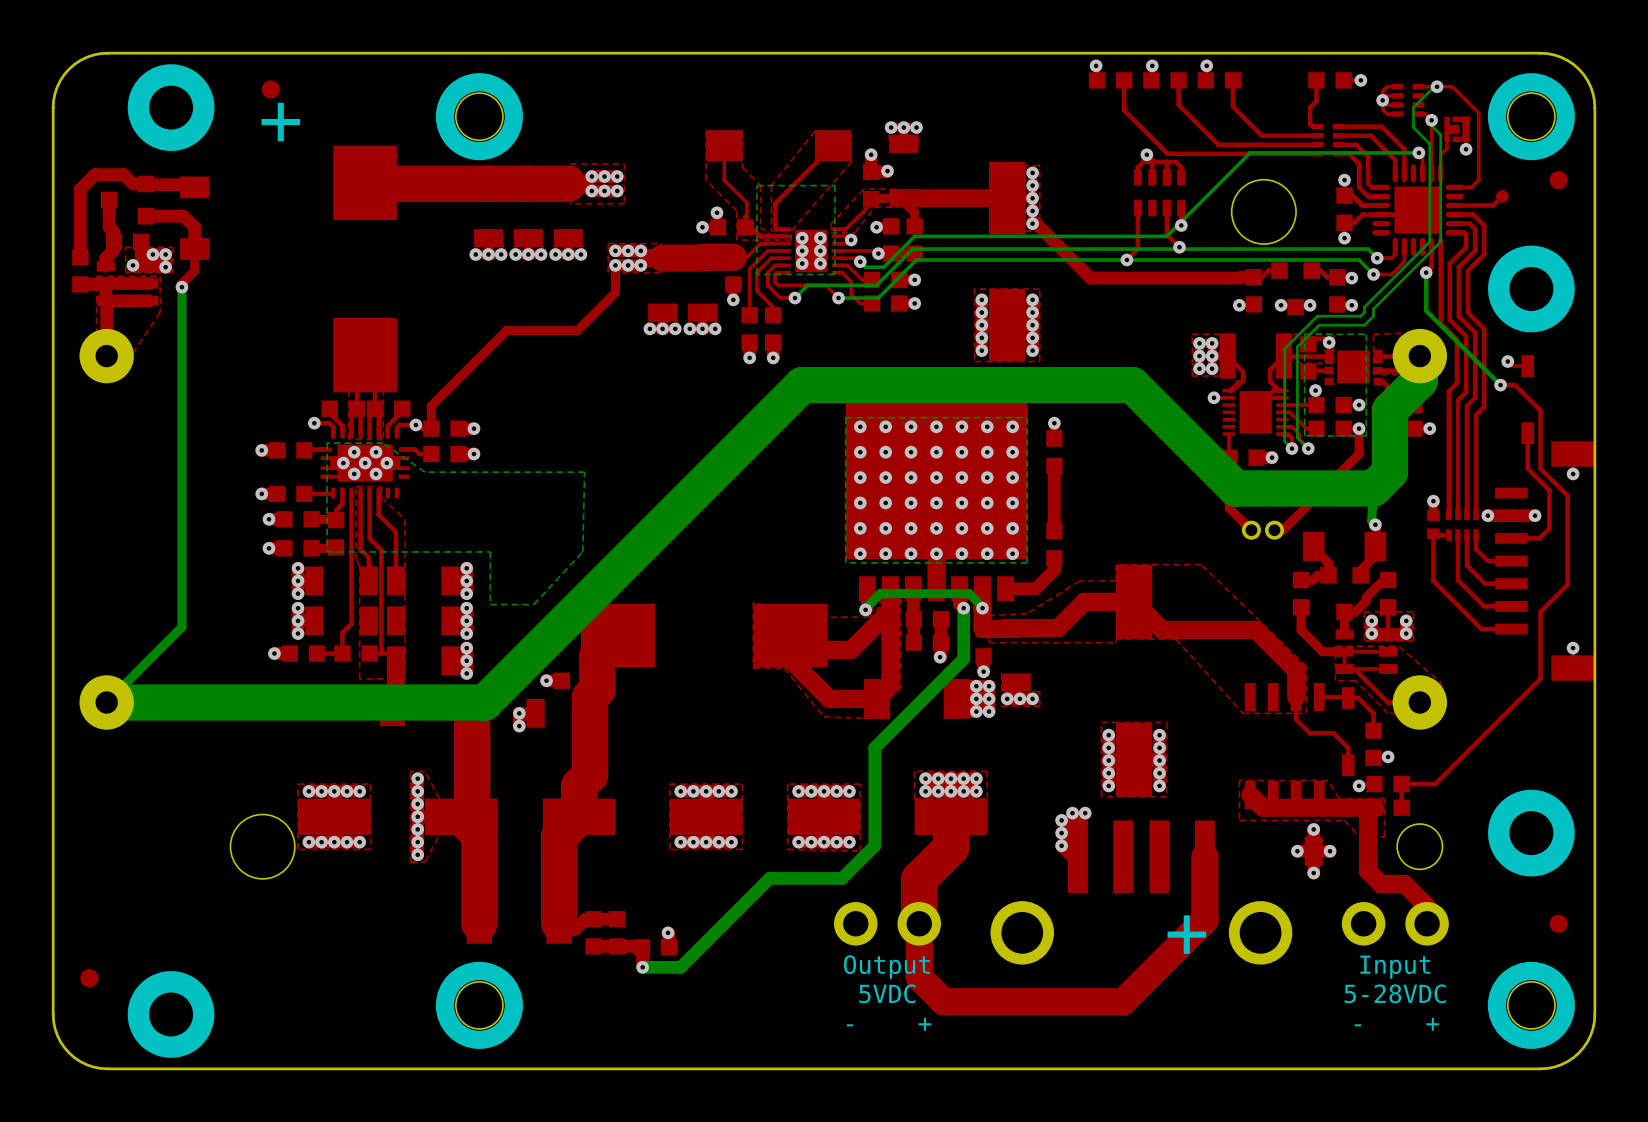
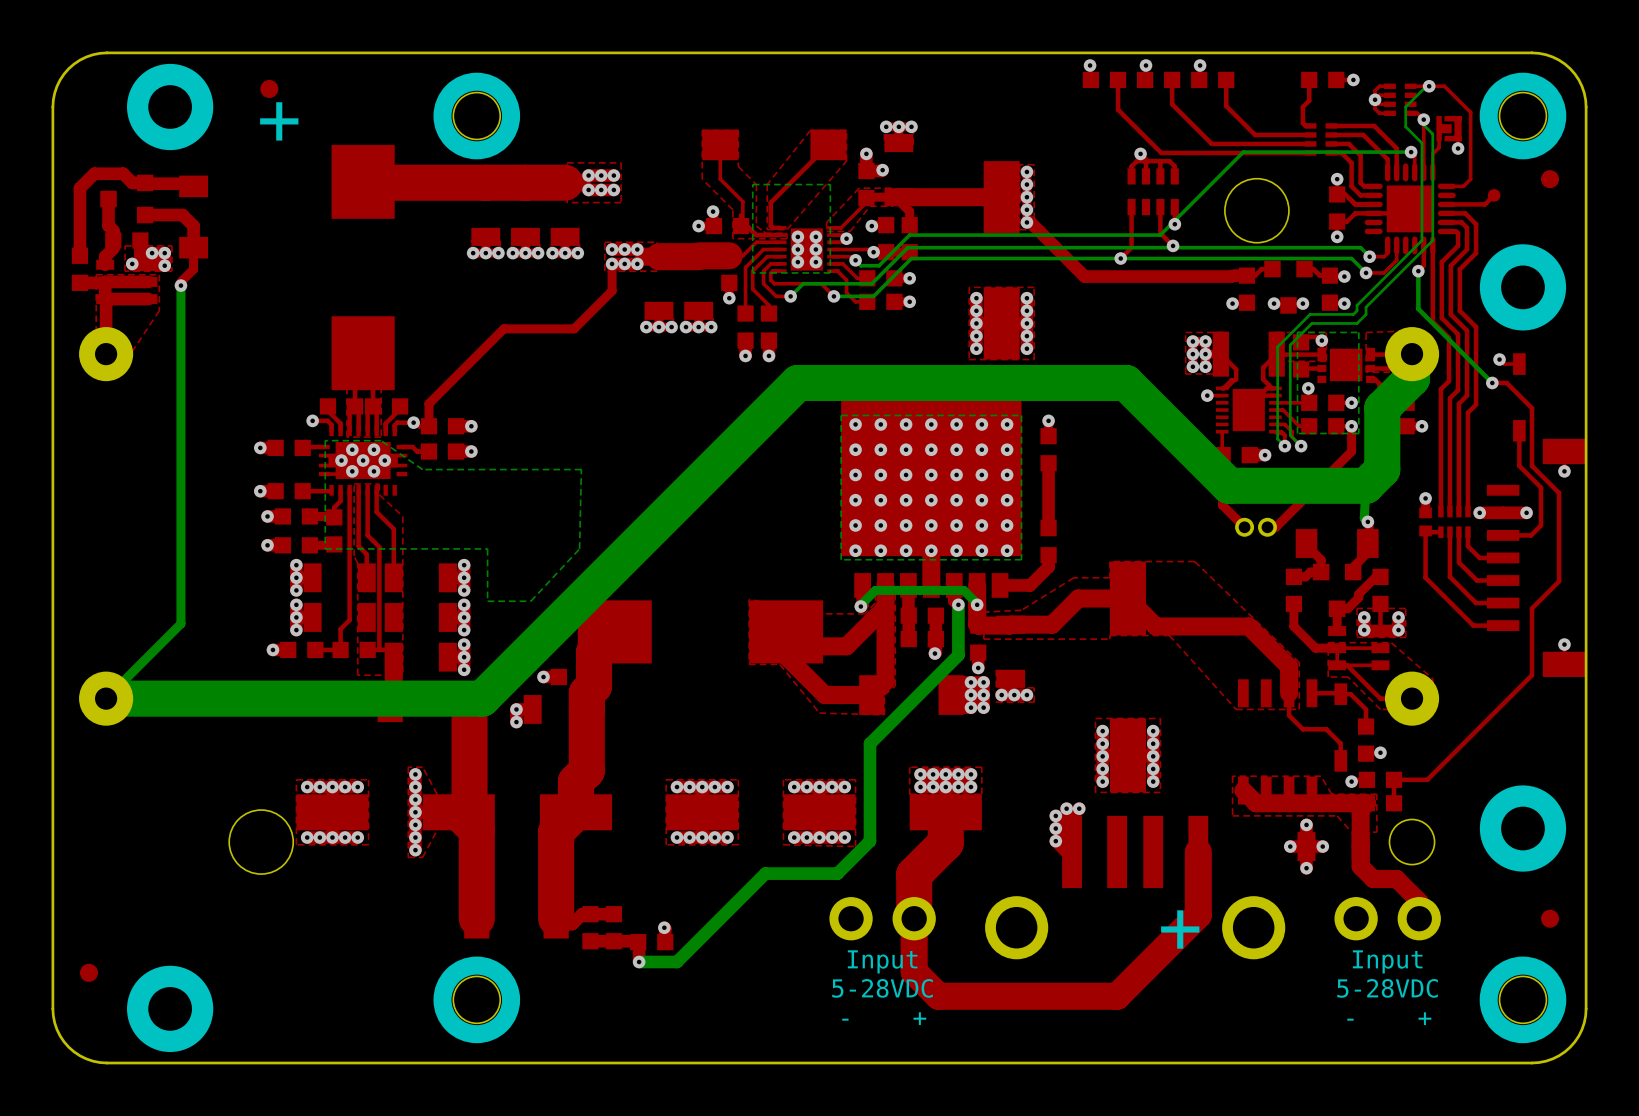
text: Output (886, 967) -> Input (882, 961)
text: 5VDC (887, 993) -> 5-28VDC (882, 988)

